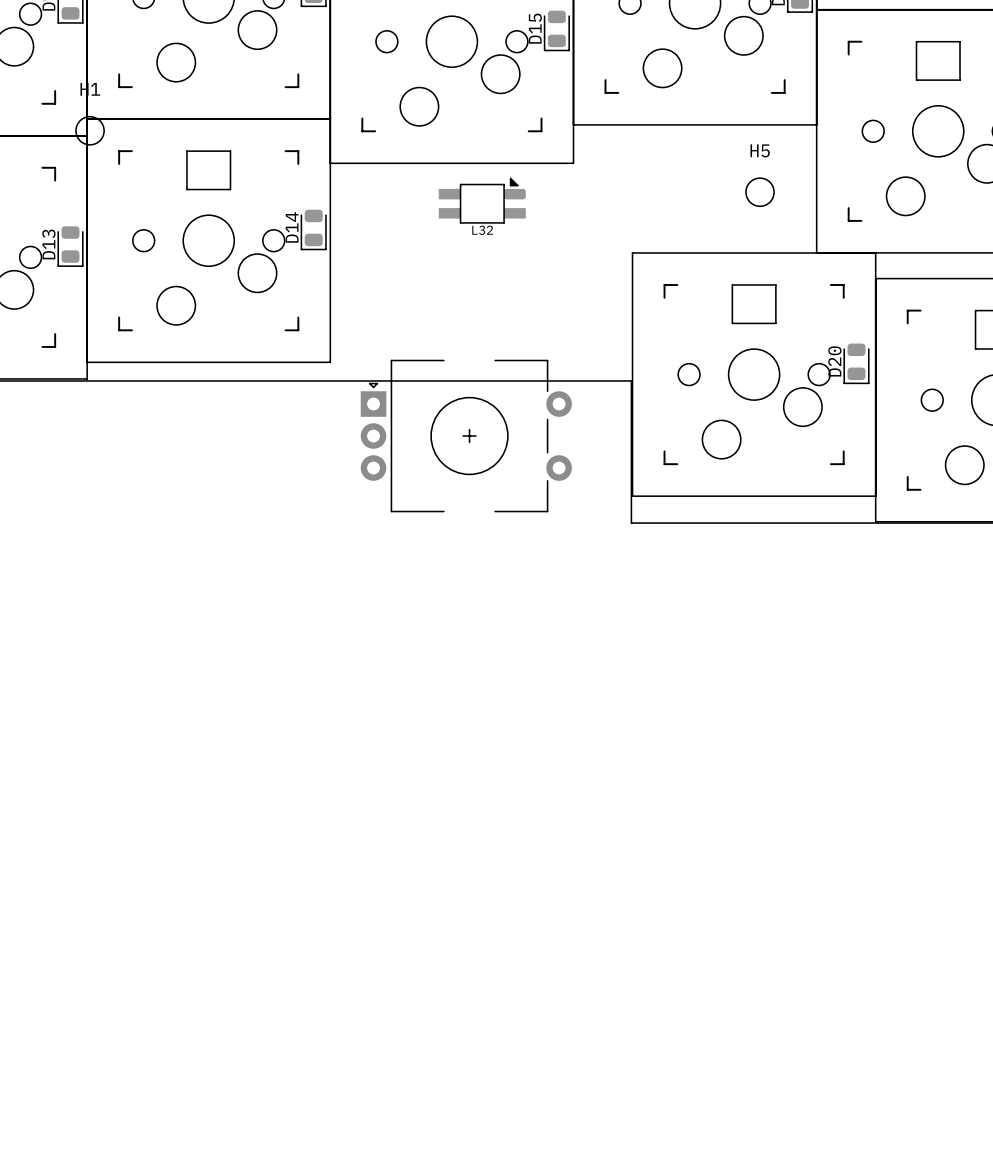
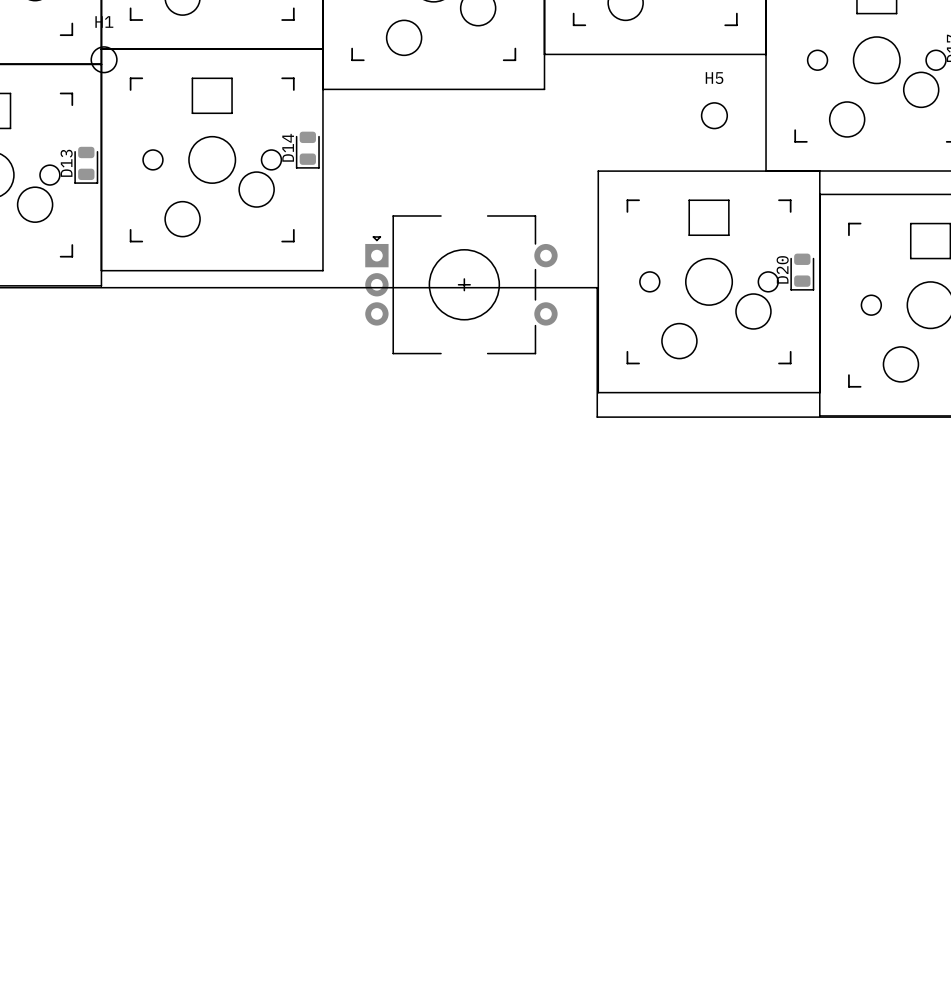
L32: (482, 200) -> none
part position: (466, 436) -> (461, 284)

